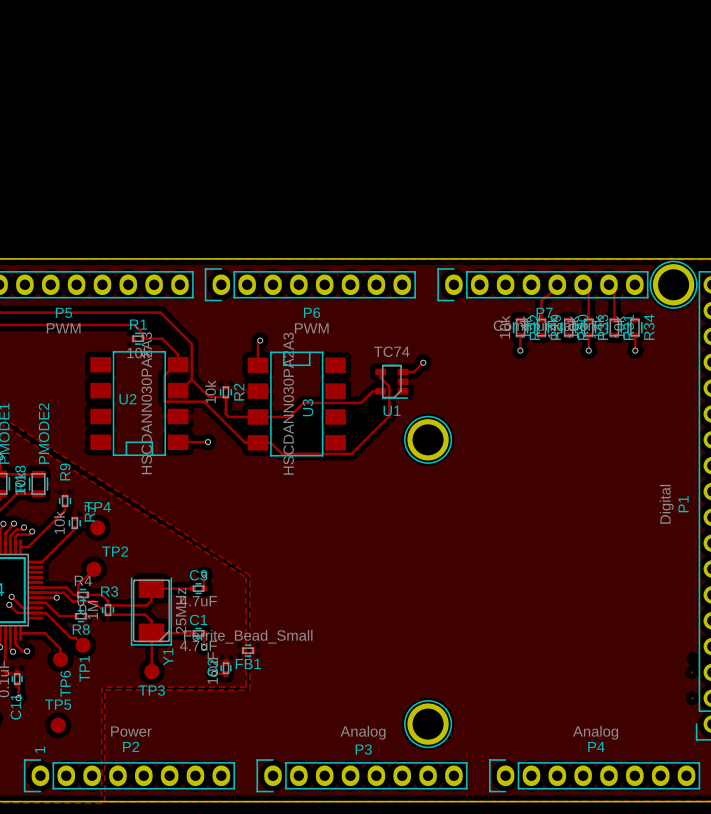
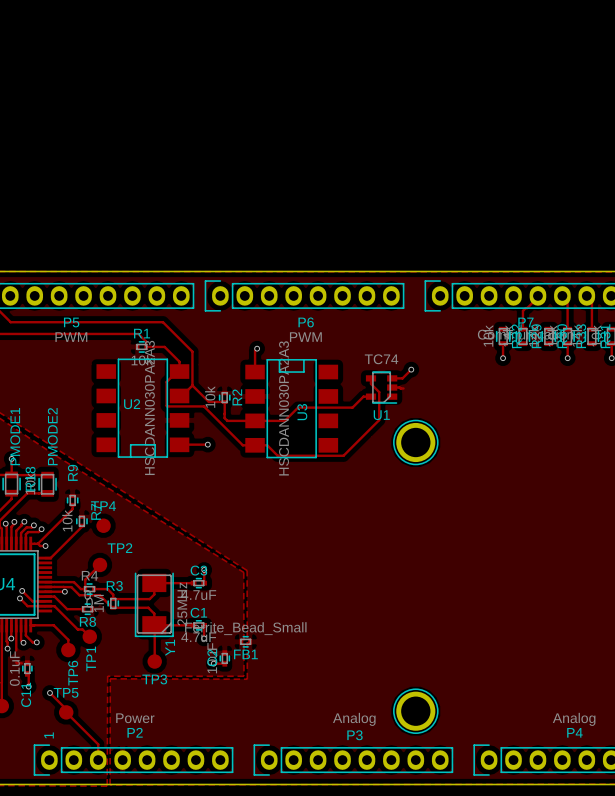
track: none -> (392, 387) (403, 388)
track: none -> (37, 543) (40, 546) (45, 546)
via: none -> (45, 546)
track: none -> (49, 692) (98, 744) (98, 760)
via: none -> (49, 692)

